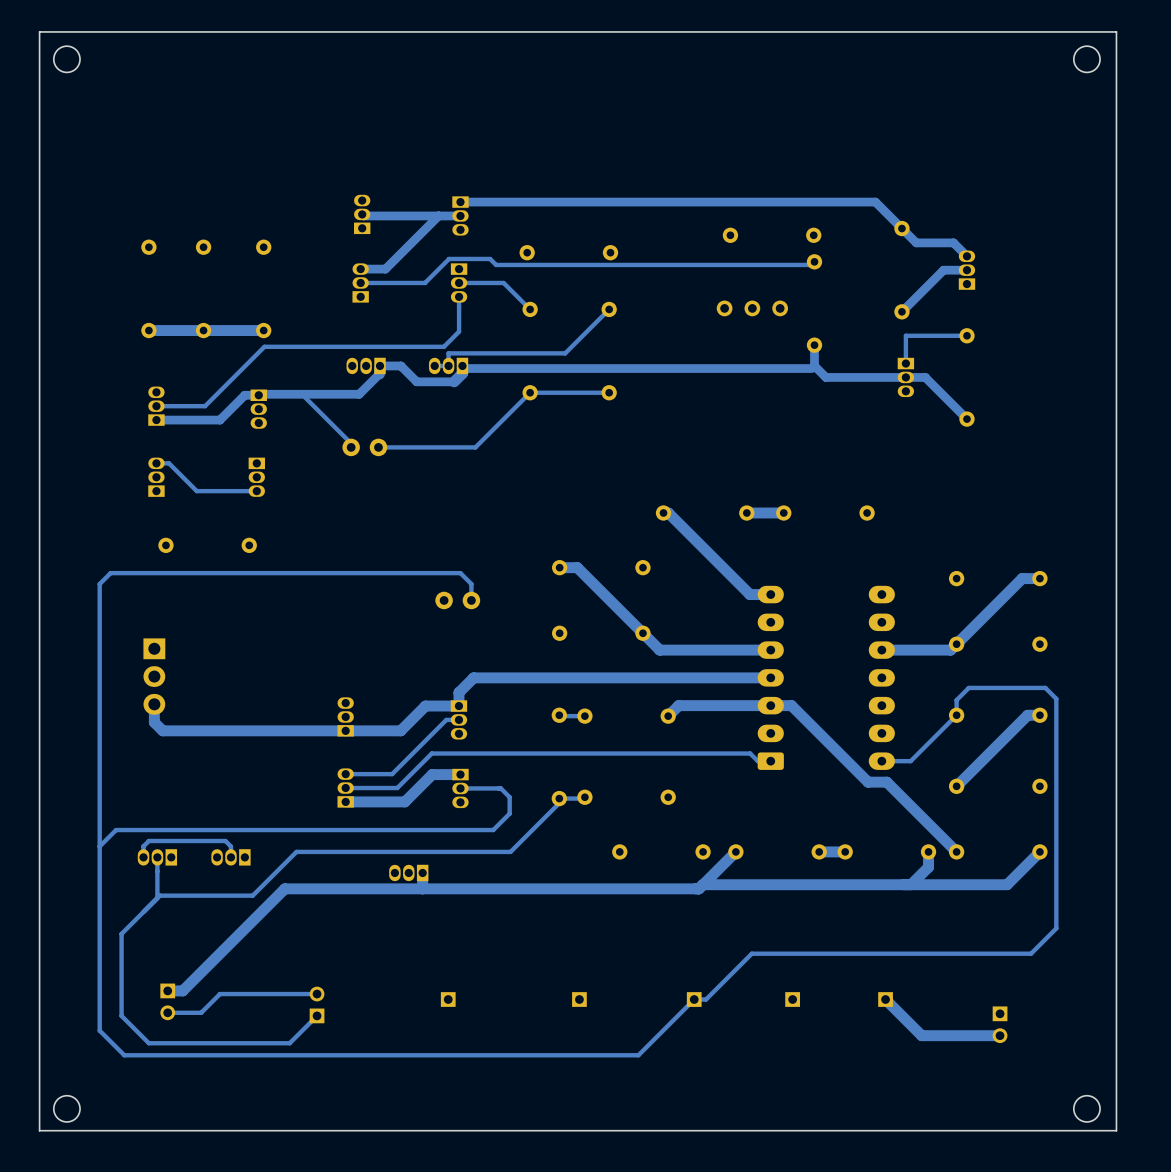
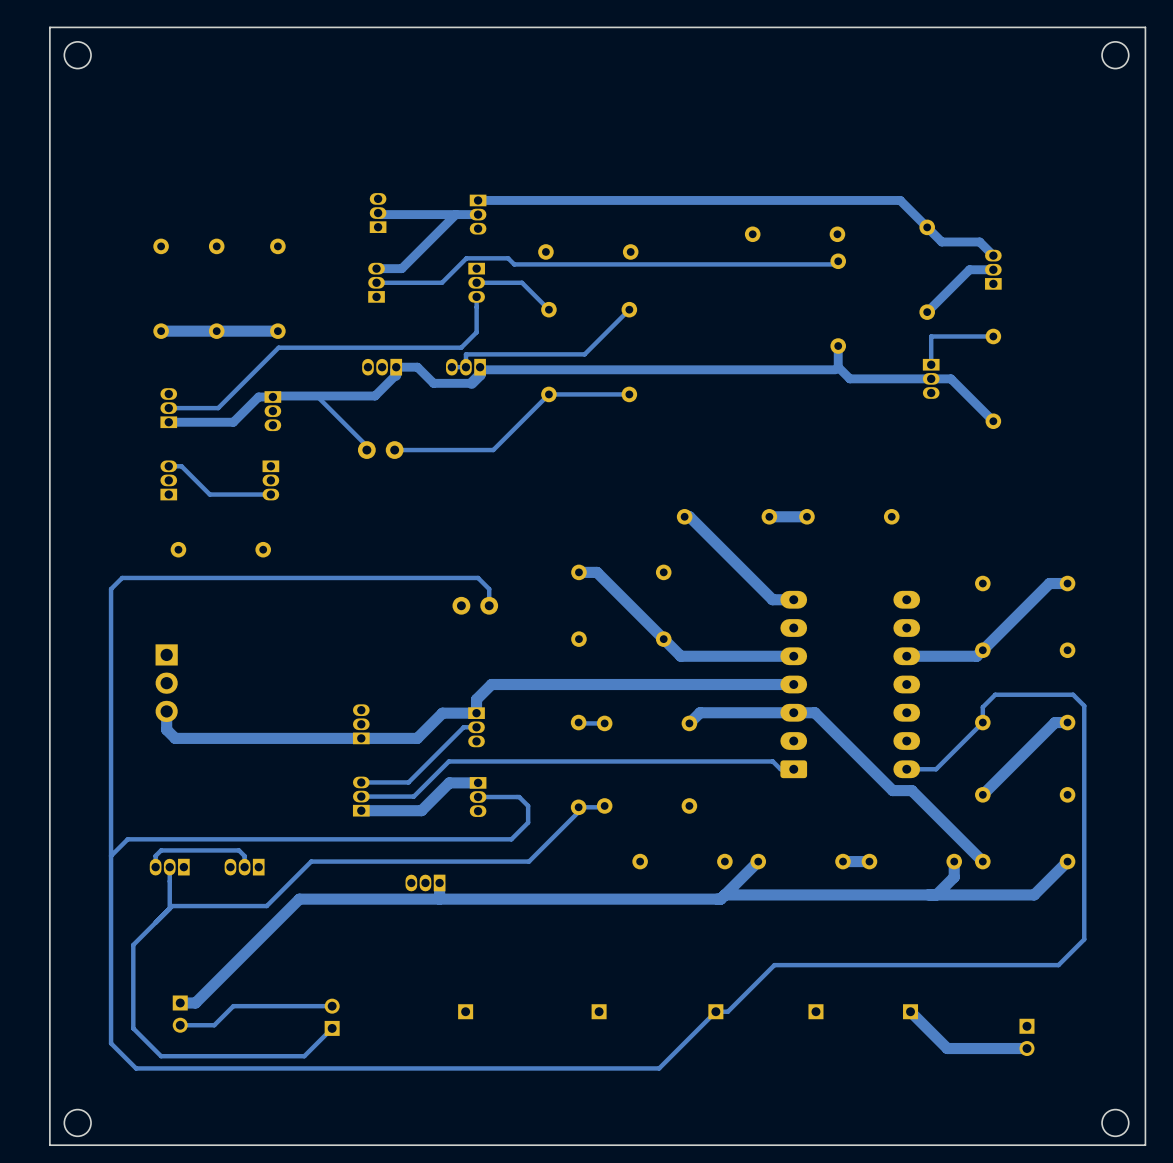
part: (752, 308) -> none

